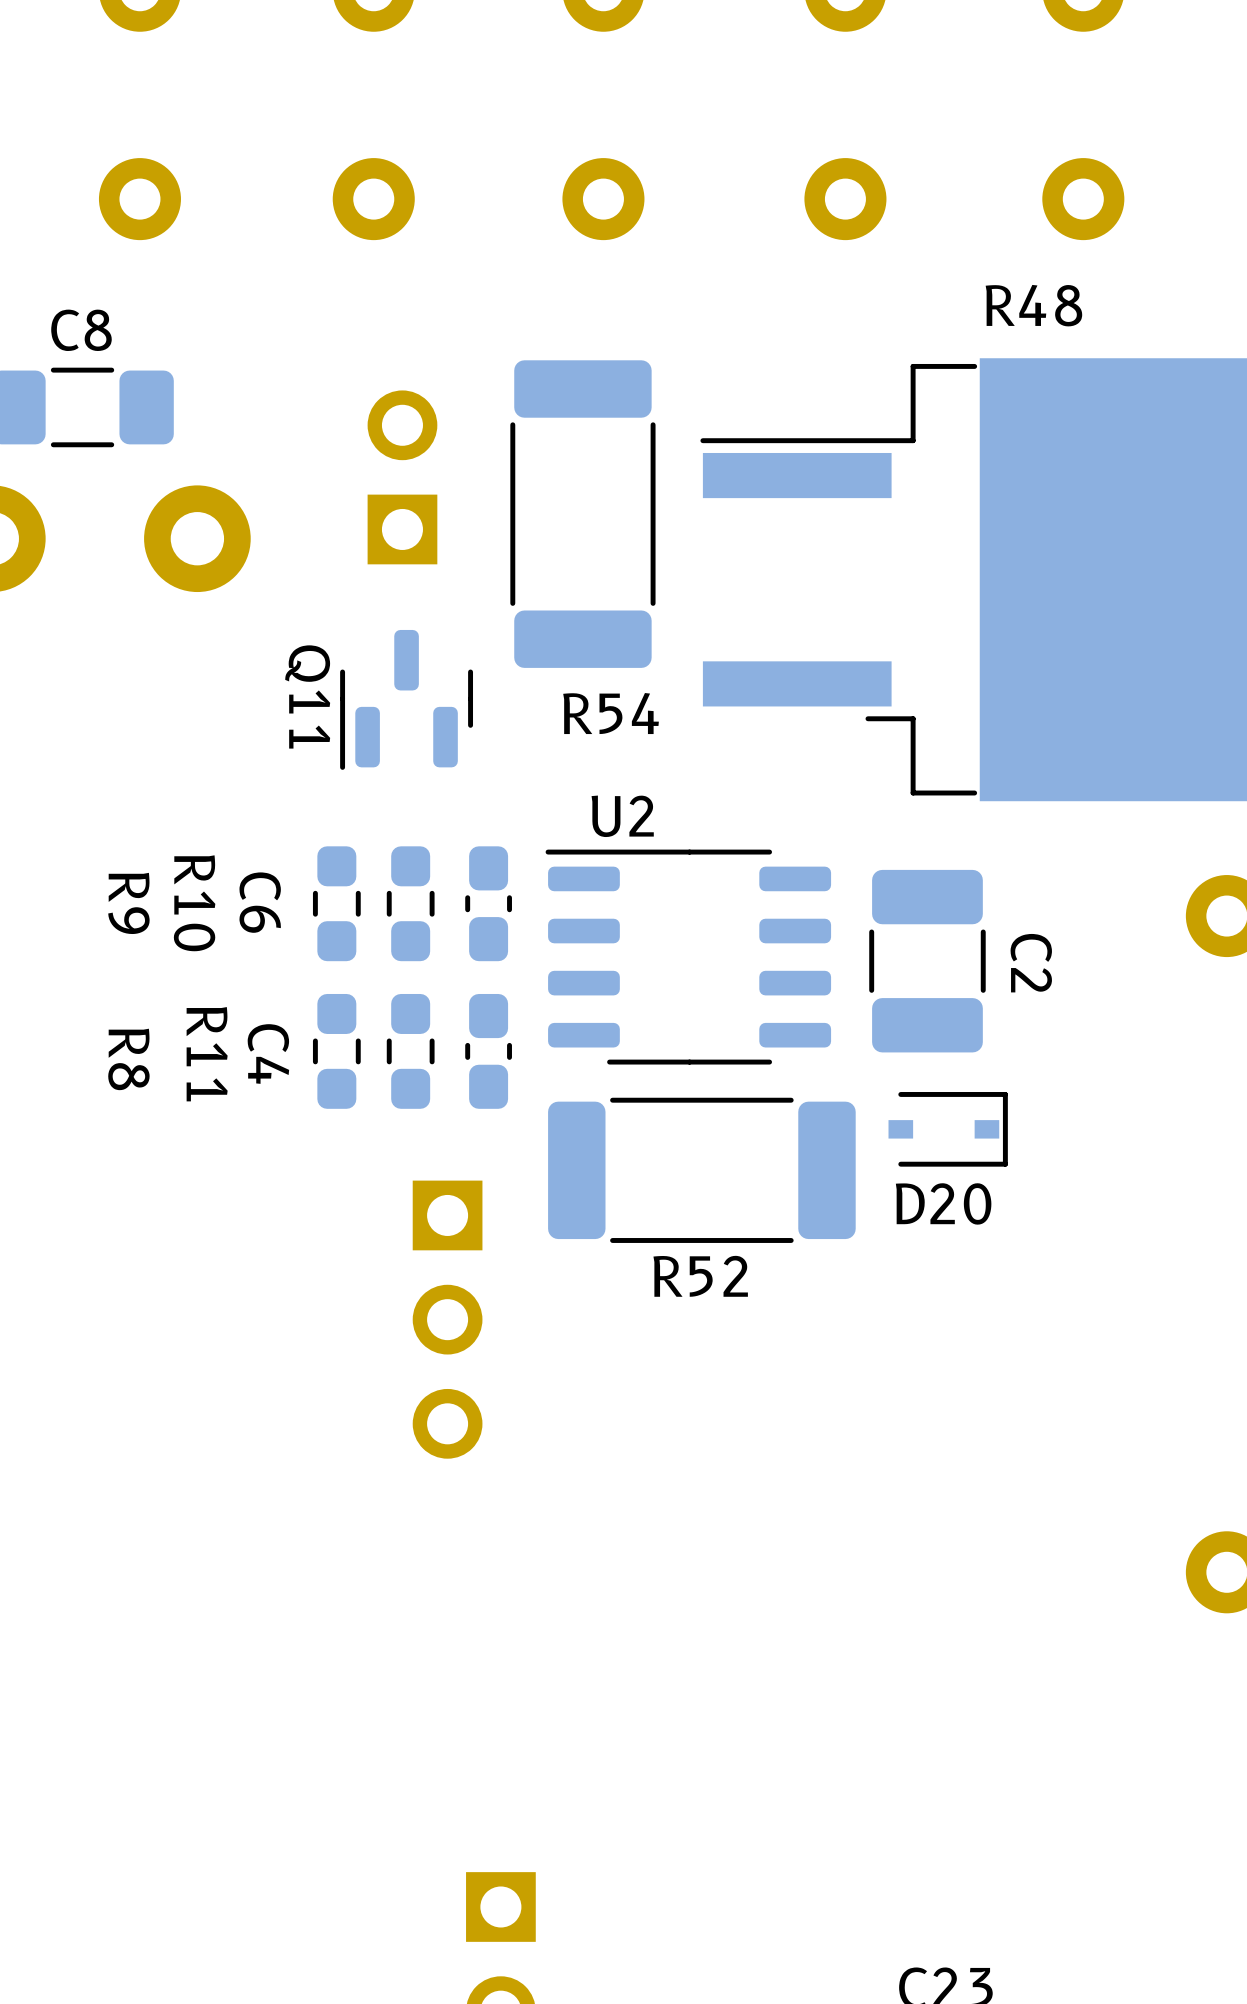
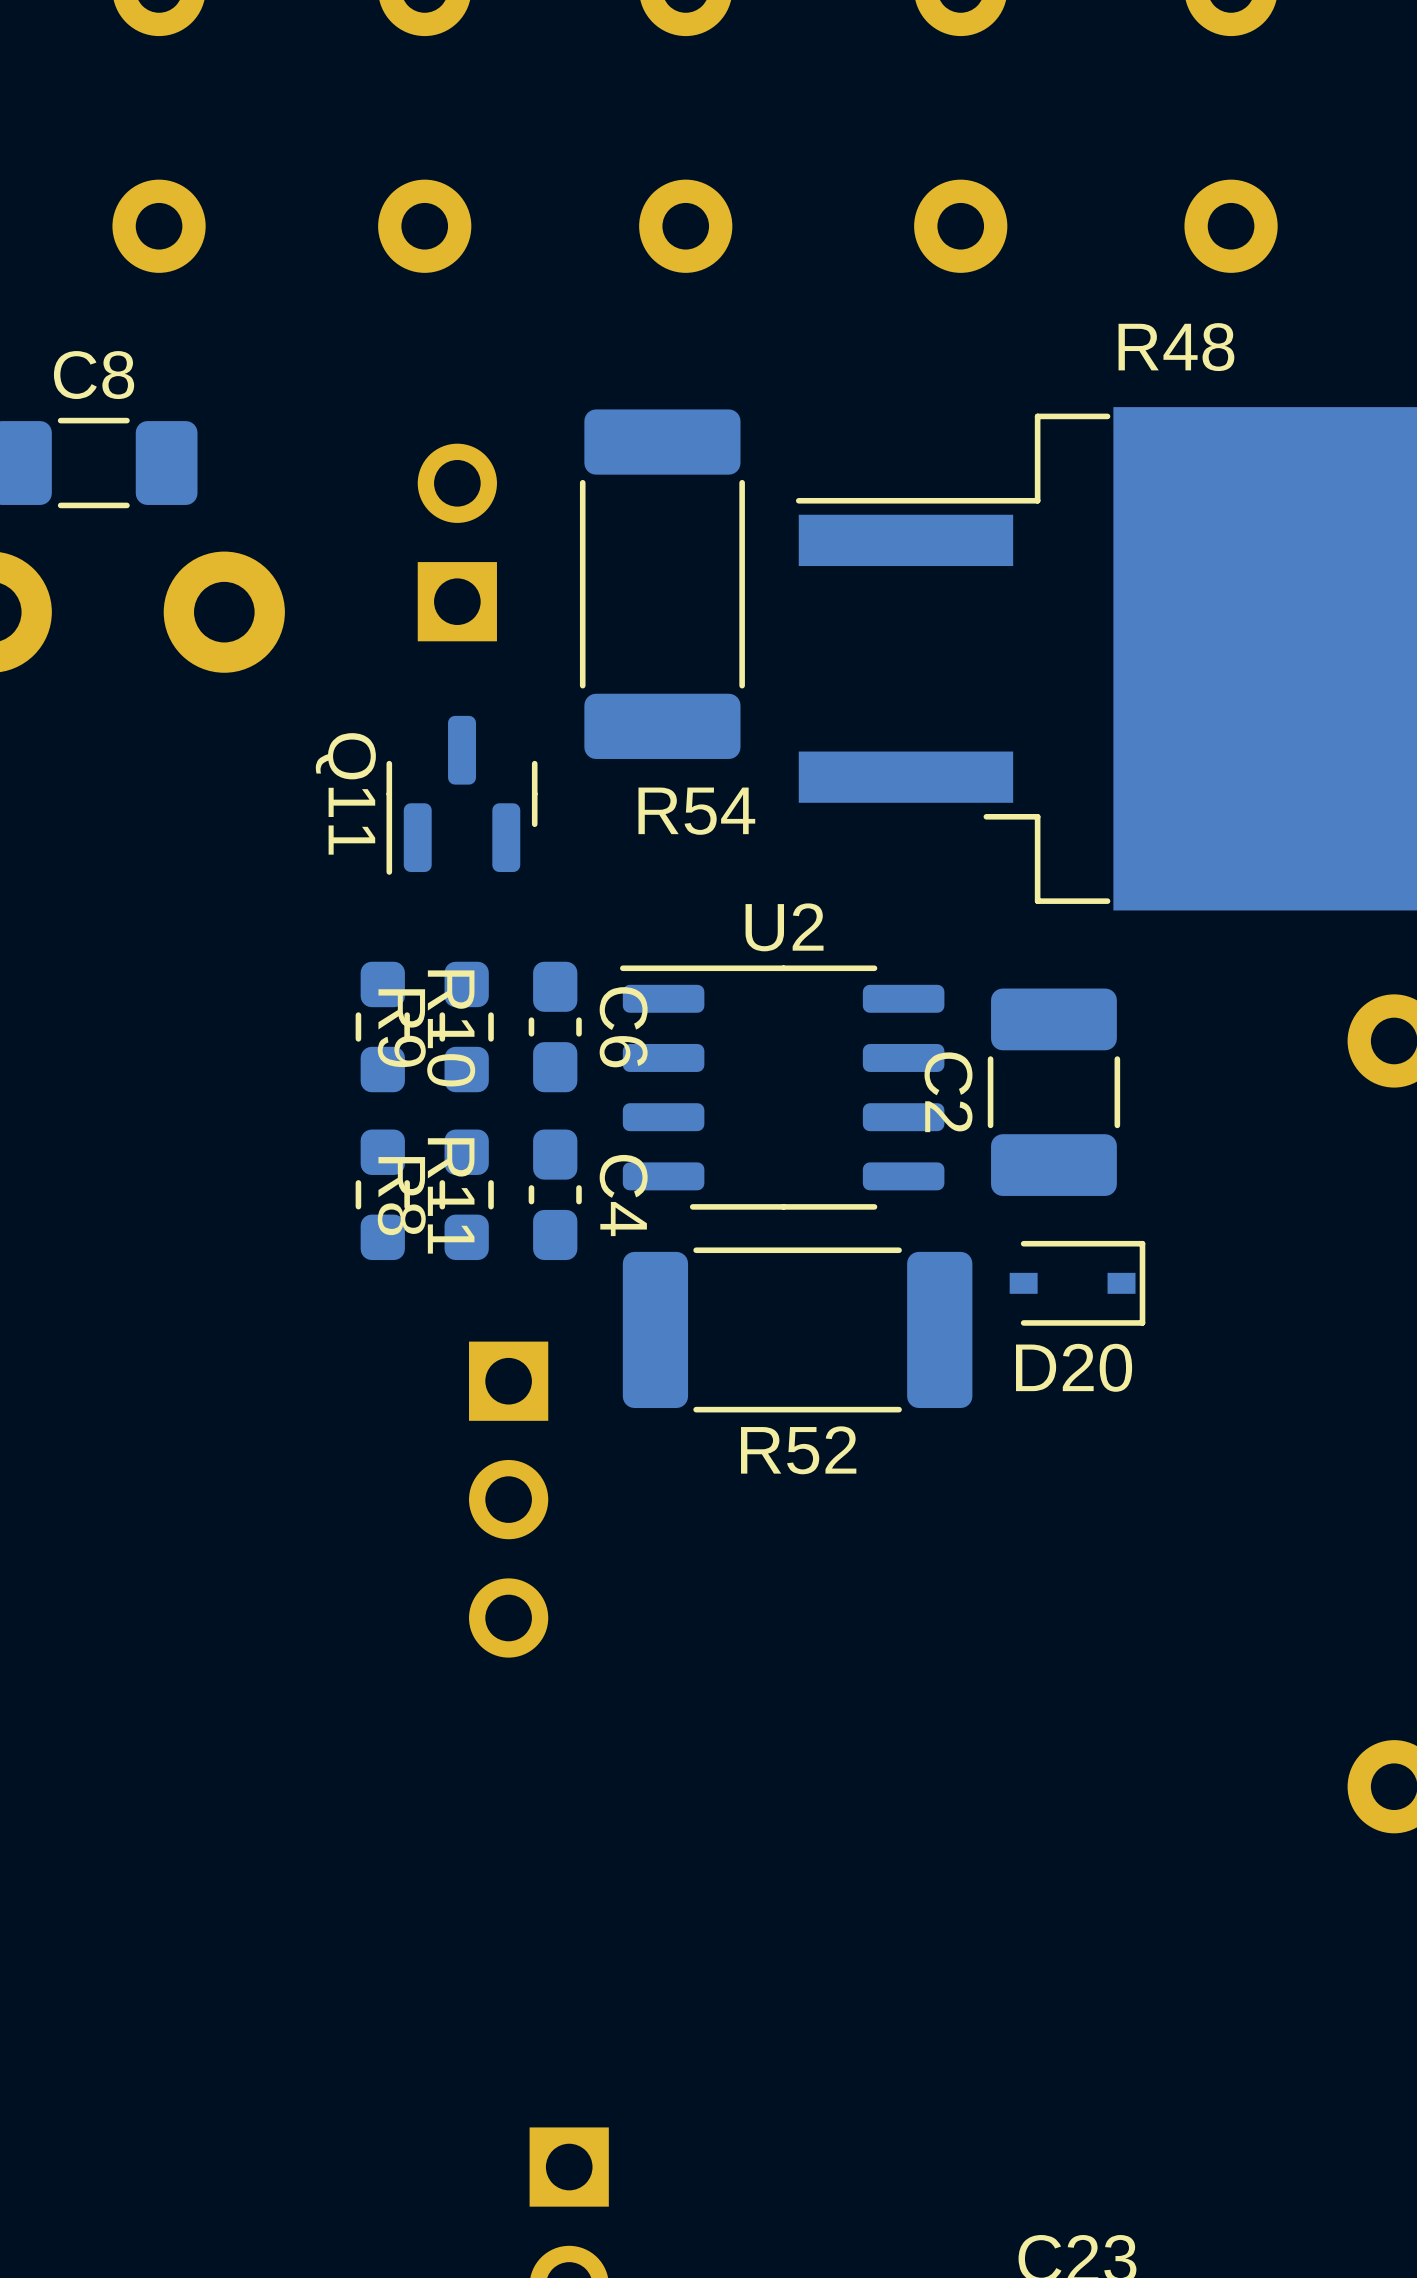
U2 name position: U2 (622, 816) -> U2 (784, 927)
C6 name position: C6 (260, 902) -> C6 (623, 1027)
R9 name position: R9 (128, 903) -> R9 (401, 1028)
R10 name position: R10 (194, 903) -> R10 (451, 1028)
C2 name position: C2 (1031, 963) -> C2 (948, 1092)
R11 name position: R11 (207, 1054) -> R11 (451, 1195)
C4 name position: C4 (268, 1054) -> C4 (623, 1195)
R8 name position: R8 (128, 1059) -> R8 (401, 1196)

